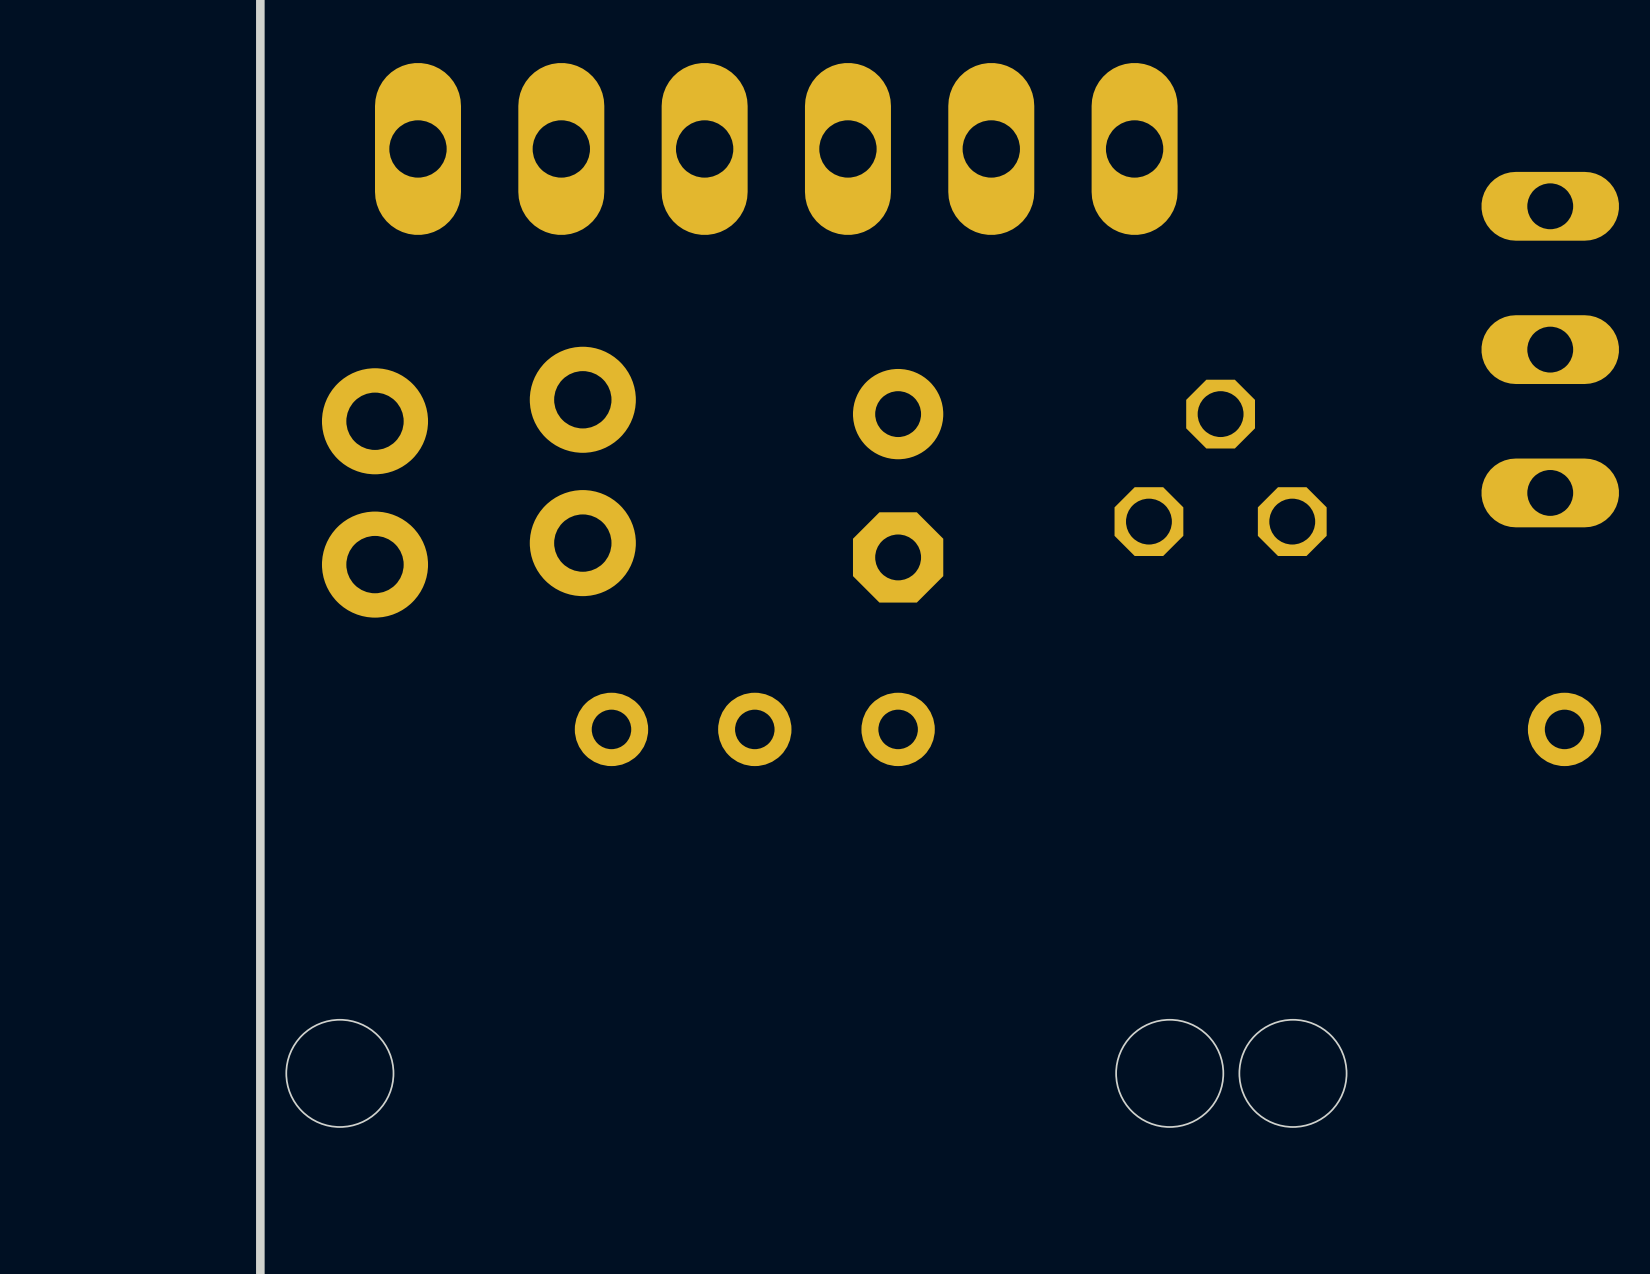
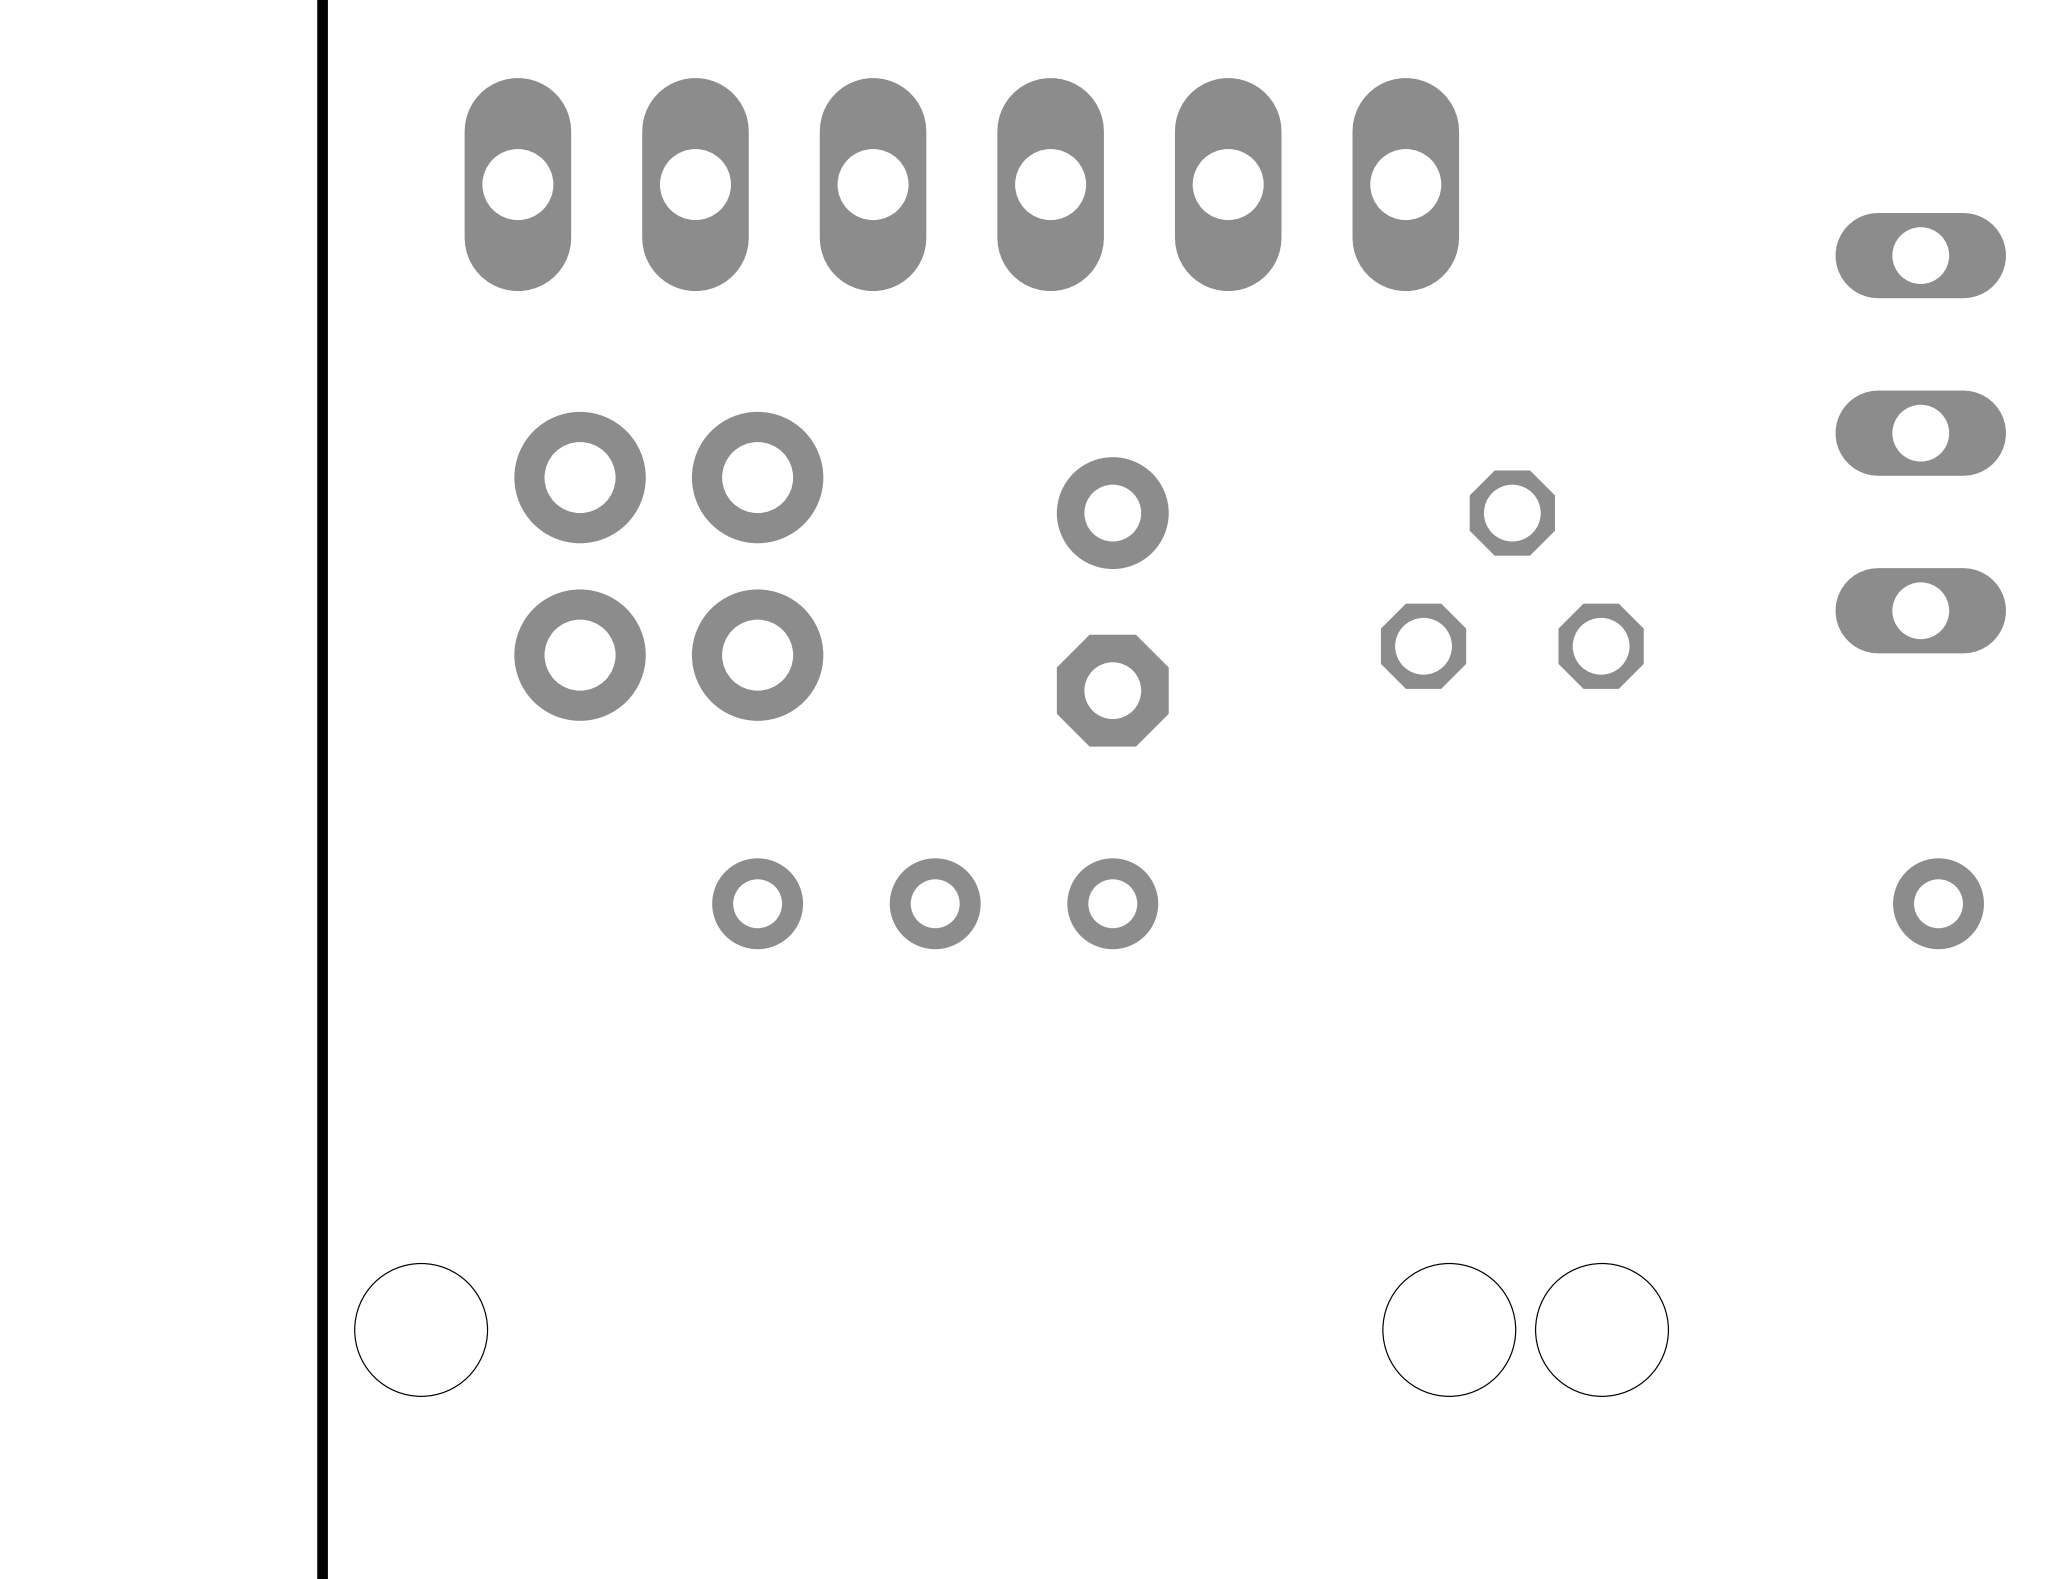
part position: (582, 471) -> (757, 566)
part position: (375, 492) -> (580, 566)

